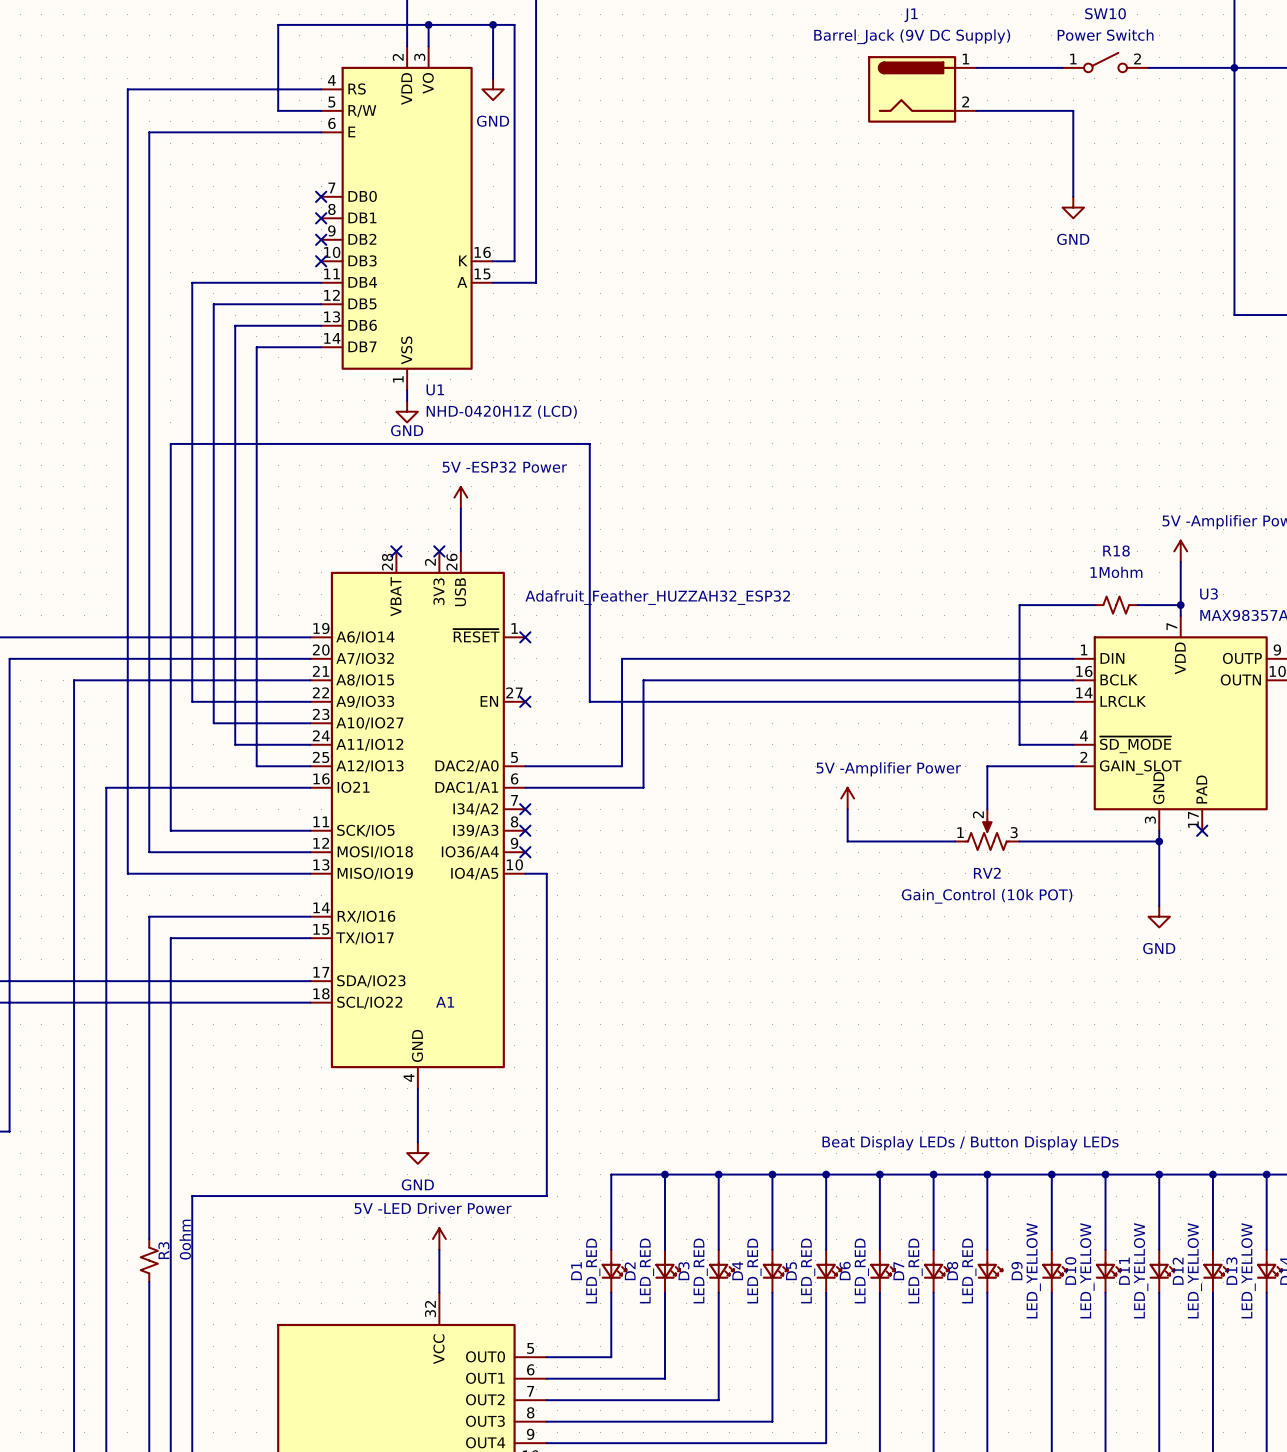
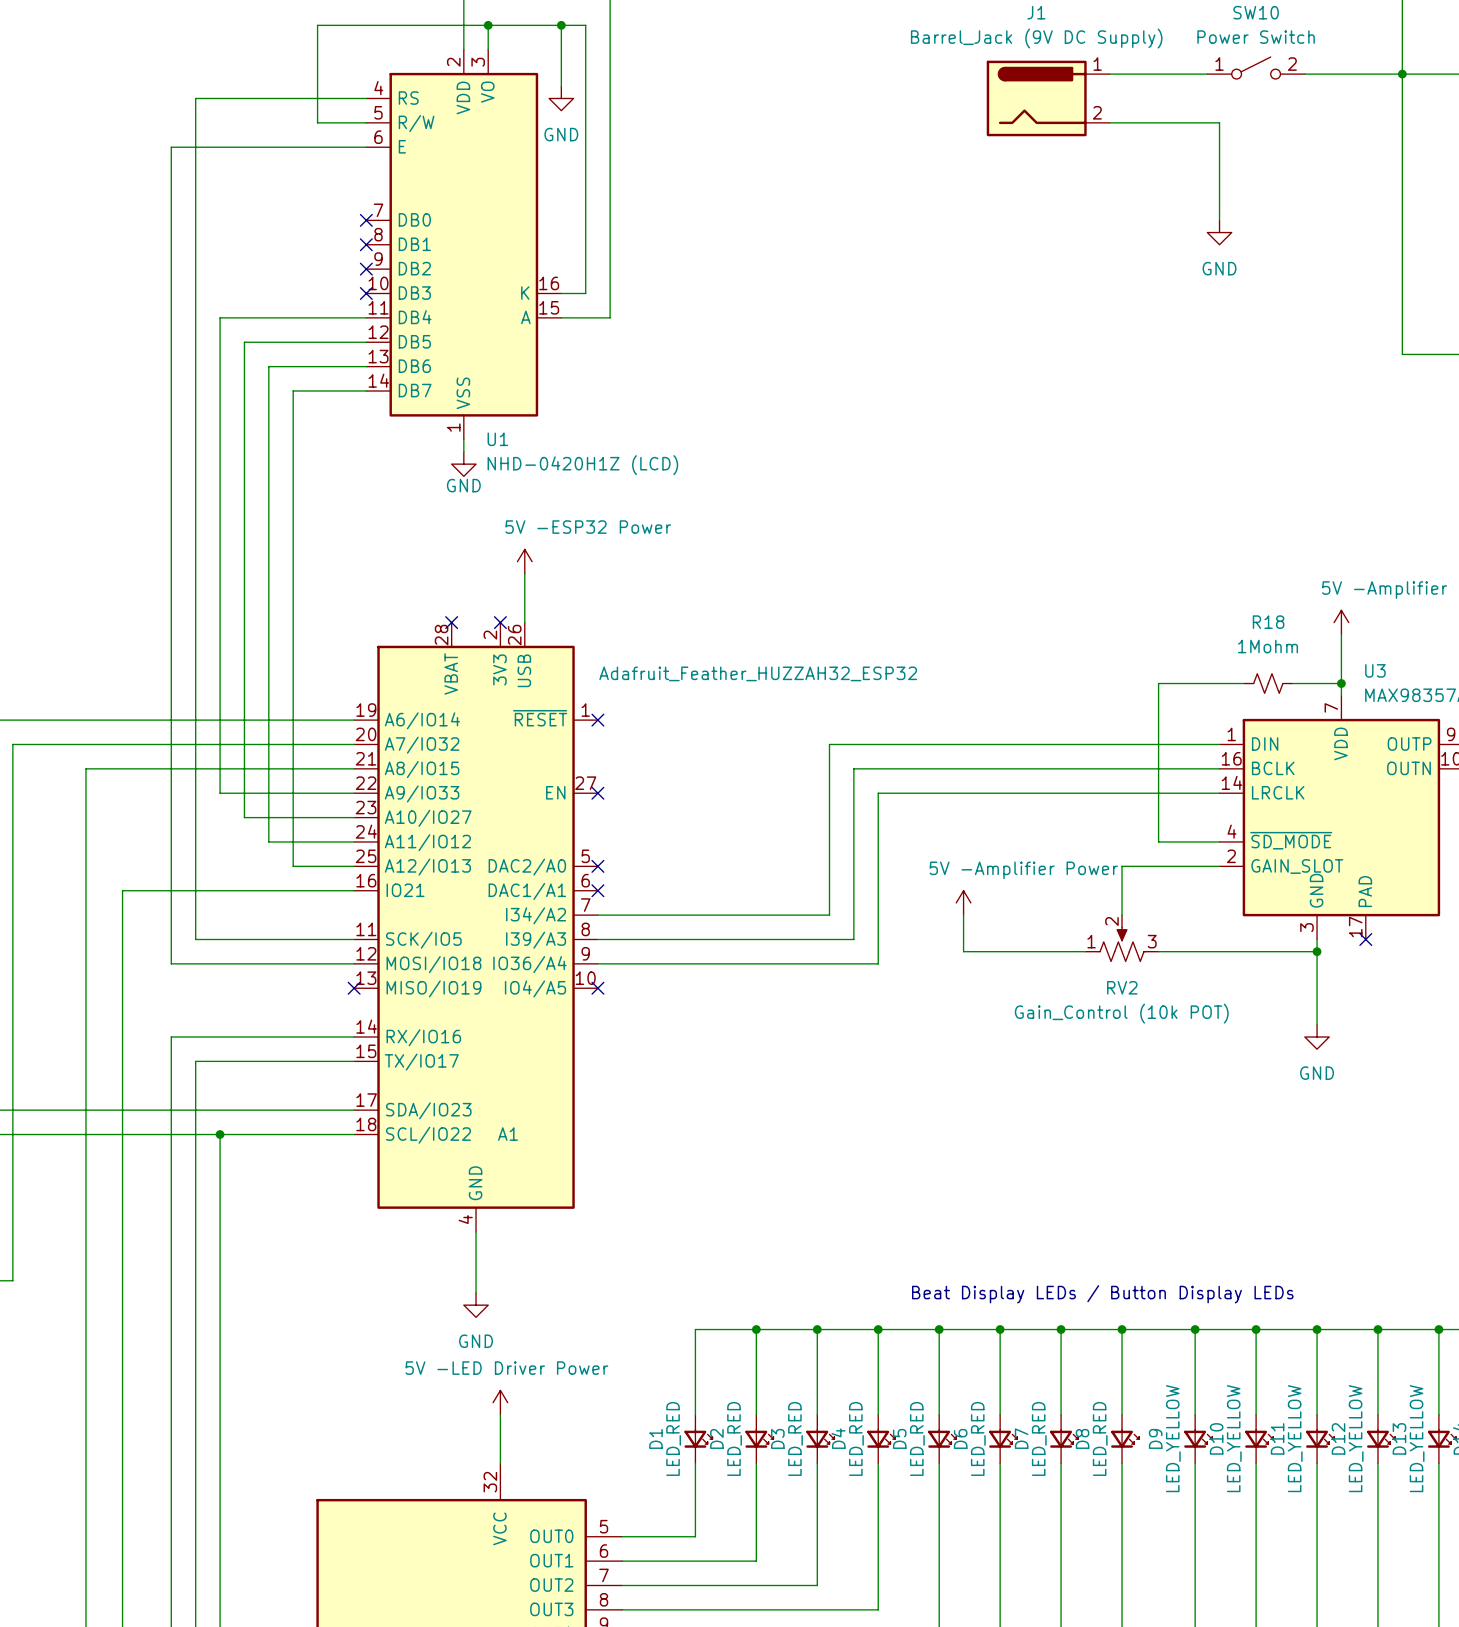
wire: (170, 89) (127, 89) (127, 873) (310, 873) -> (195, 98) (195, 500)
wire: (170, 443) (589, 443) (589, 701) (772, 701) -> (597, 963) (878, 963) (878, 793)
wire: (729, 658) (622, 658) (622, 766) (525, 766) -> (829, 744) (829, 915) (597, 915)
wire: (750, 680) (643, 680) (643, 787) (525, 787) -> (853, 768) (853, 939) (597, 939)
no-connect mark: none -> (597, 866)
no-connect mark: none -> (597, 890)
no-connect mark: (525, 809) -> none
no-connect mark: (525, 830) -> none
no-connect mark: (525, 852) -> none
no-connect mark: none -> (354, 988)
wire: (525, 873) (546, 873) (546, 1196) (192, 1196) -> (220, 1134) (220, 1353)
no-connect mark: none -> (597, 988)
junction: none -> (220, 1134)
R3: 0ohm (149, 1260) -> none

